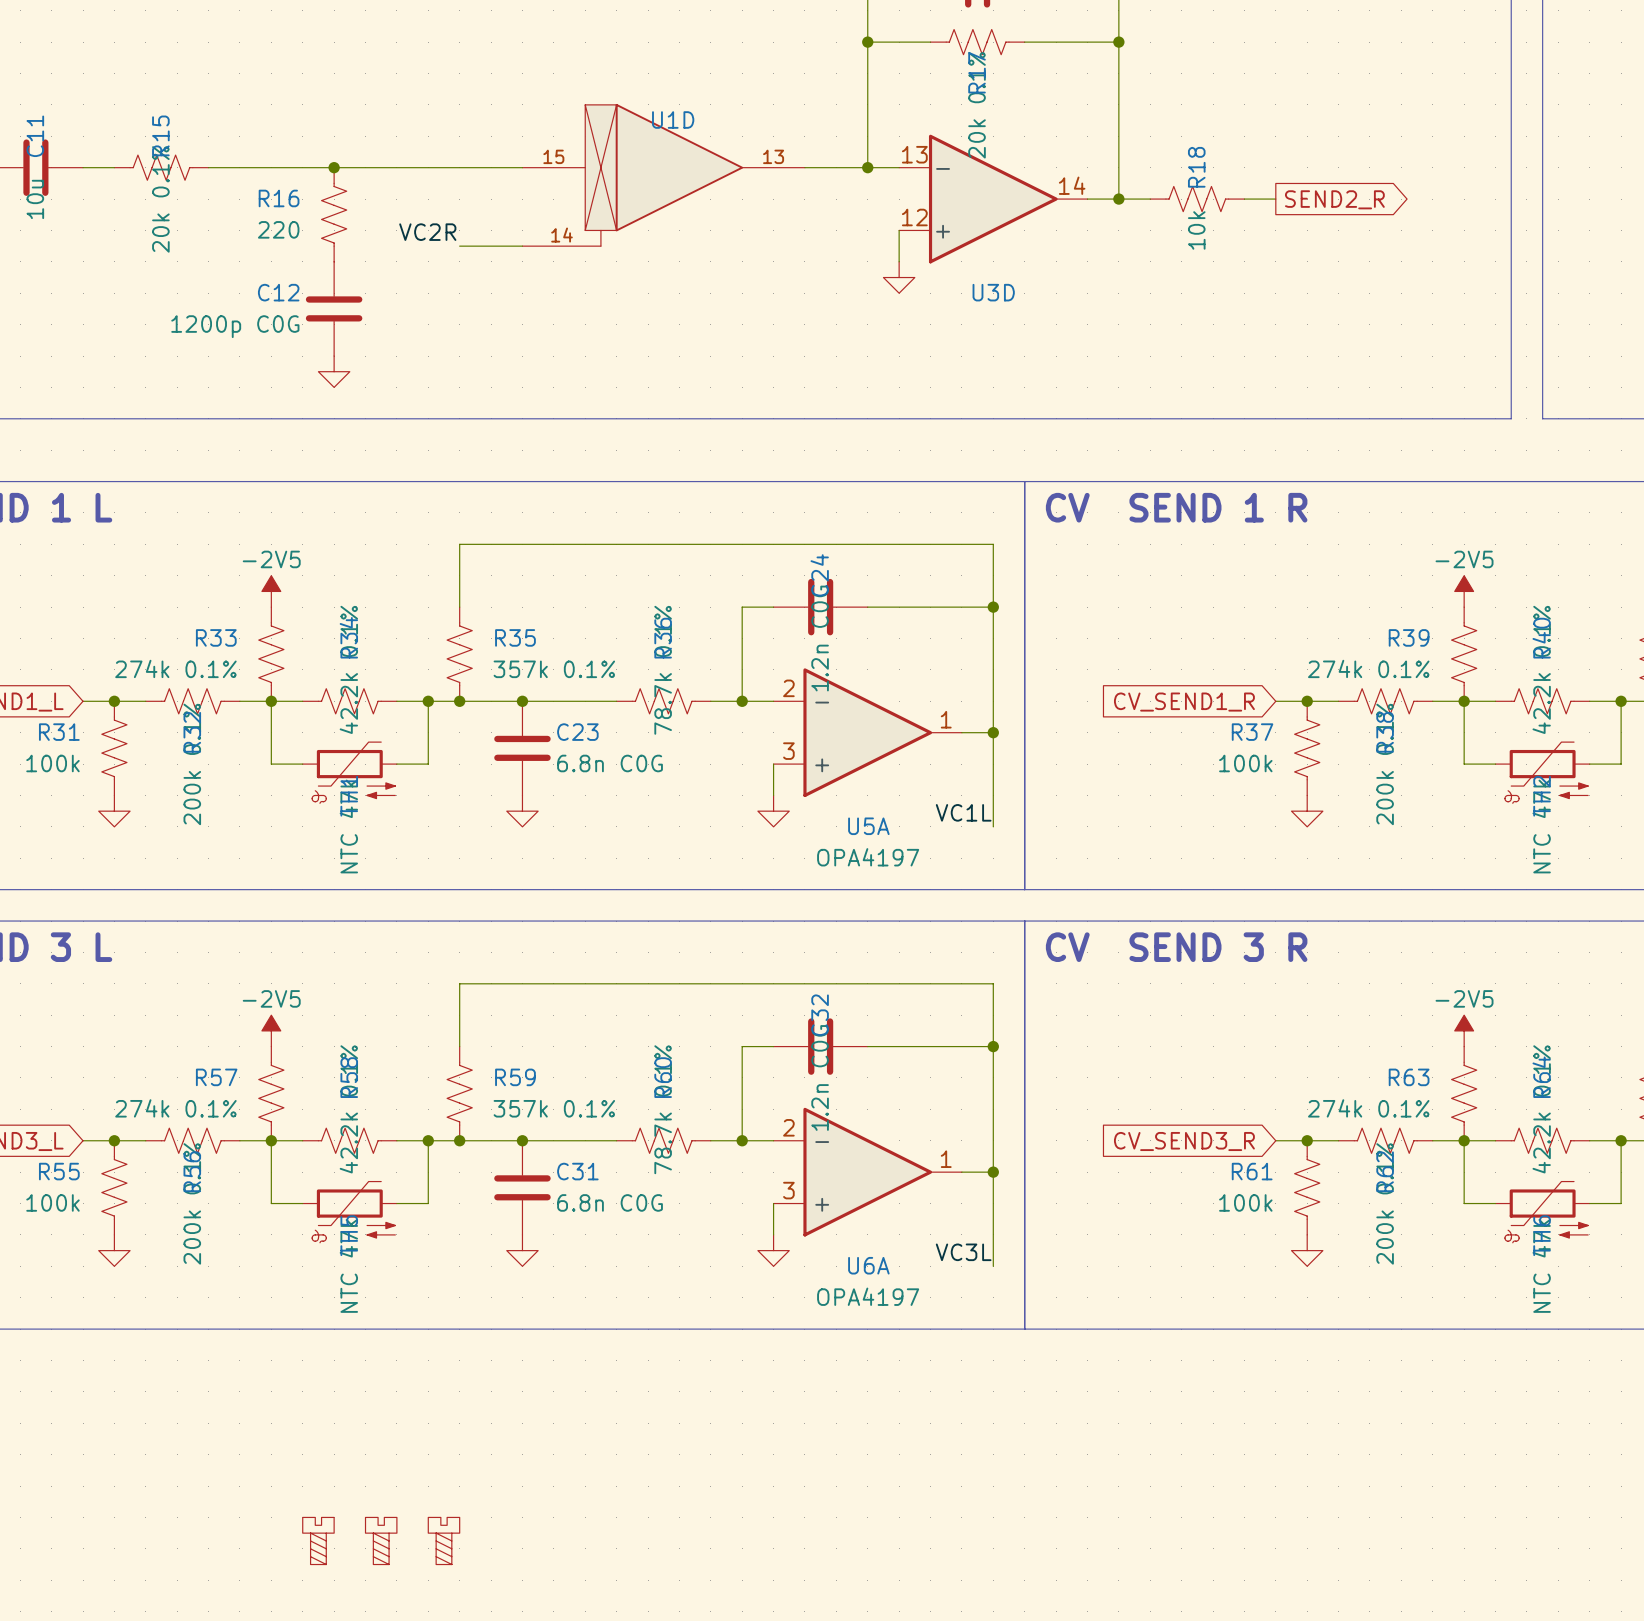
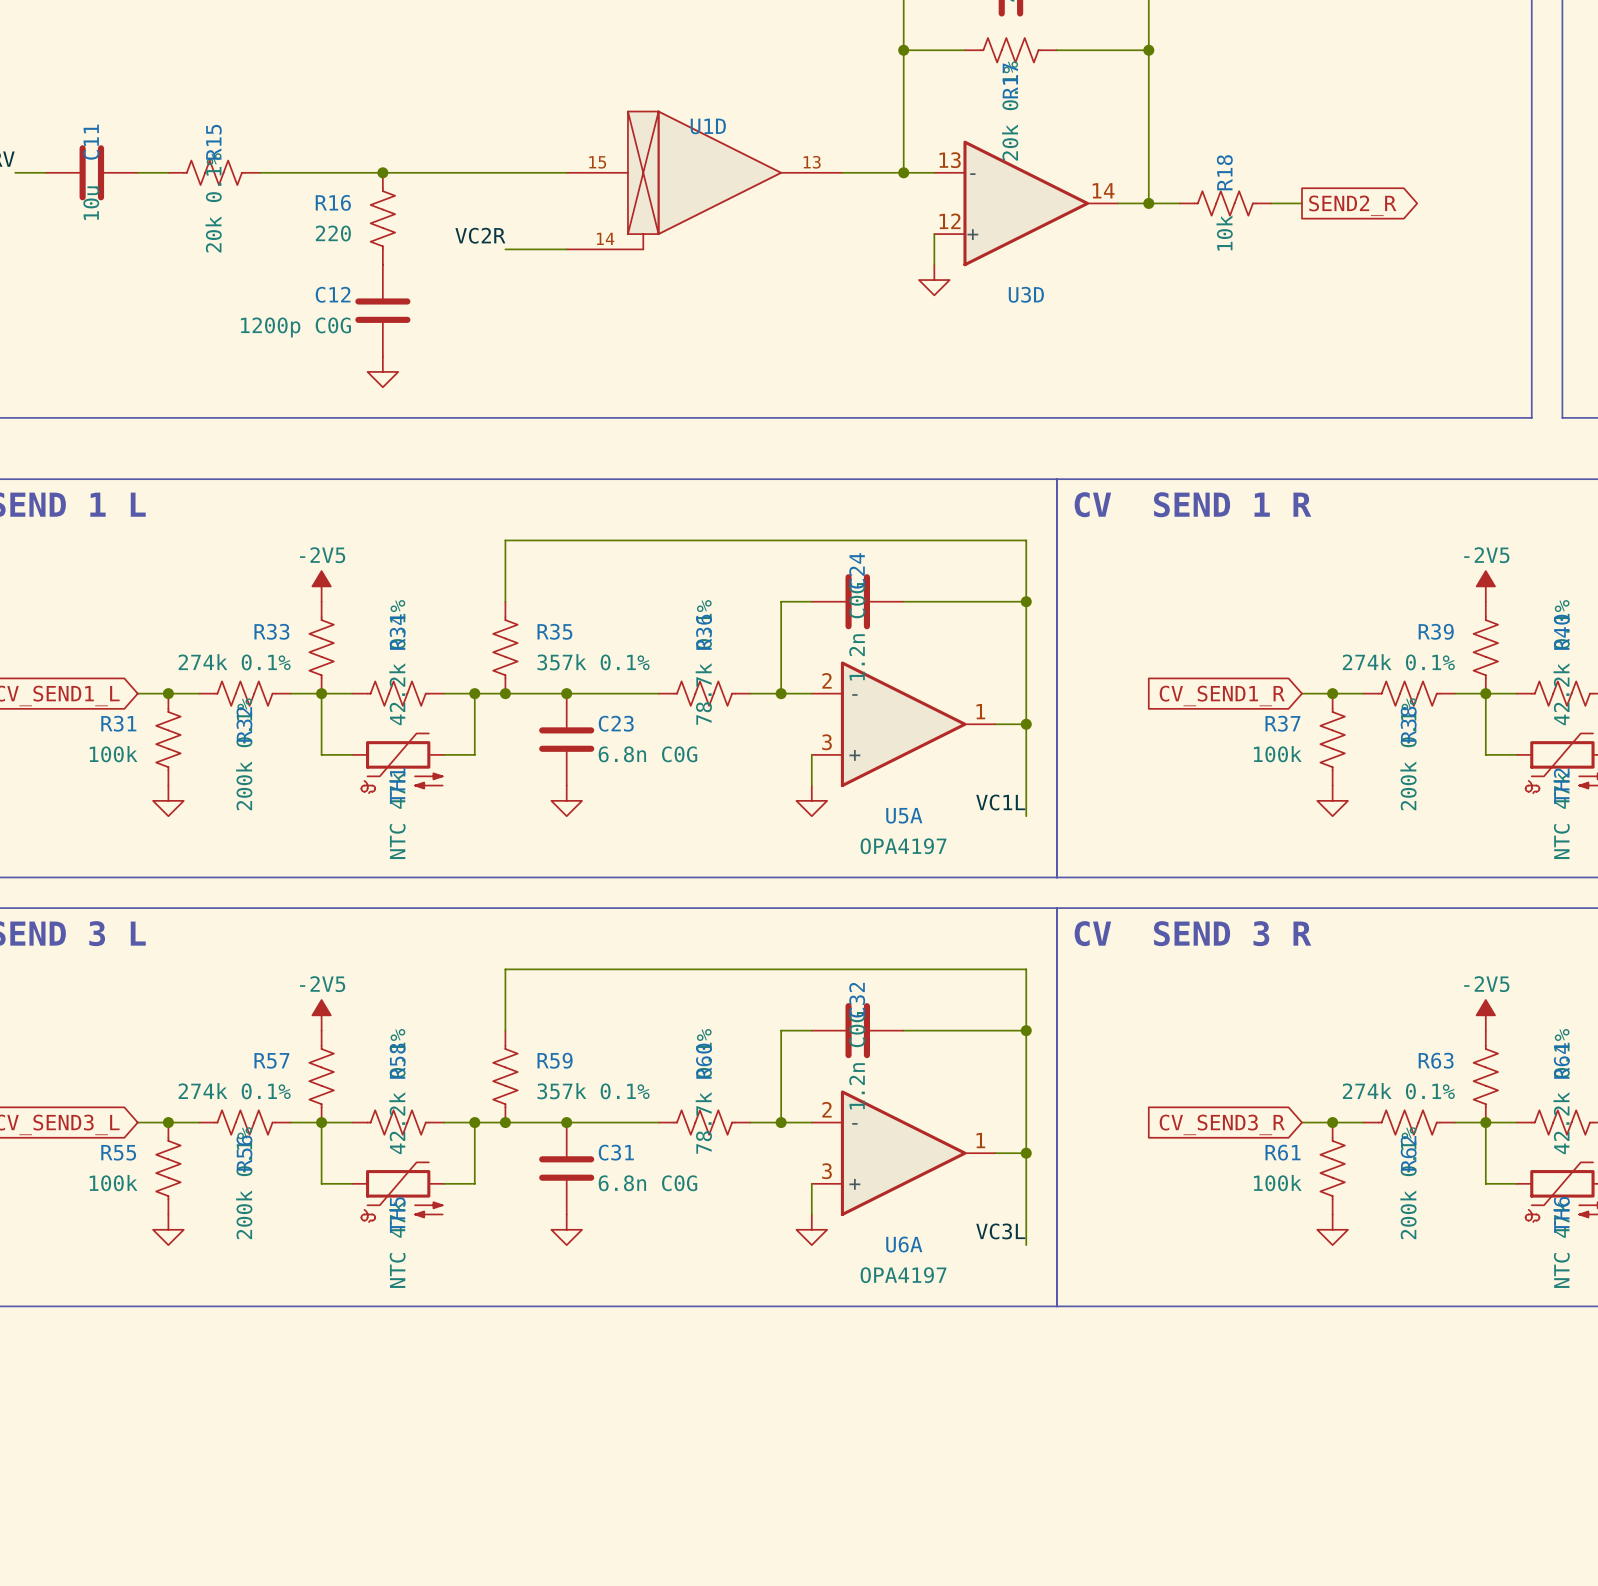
part: (318, 1540) -> none
part: (381, 1540) -> none
part: (443, 1540) -> none

